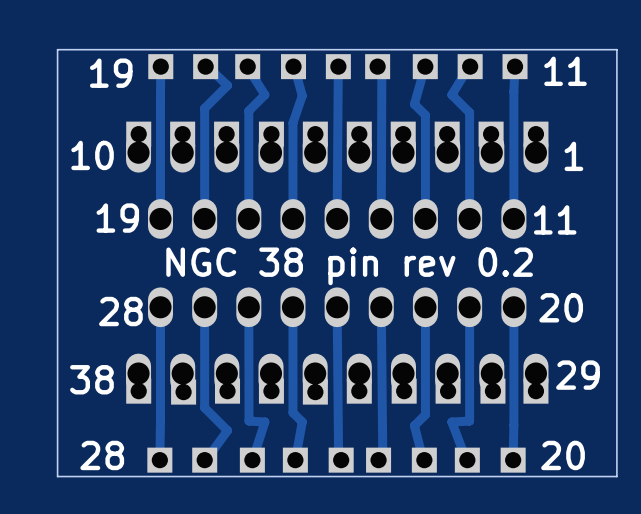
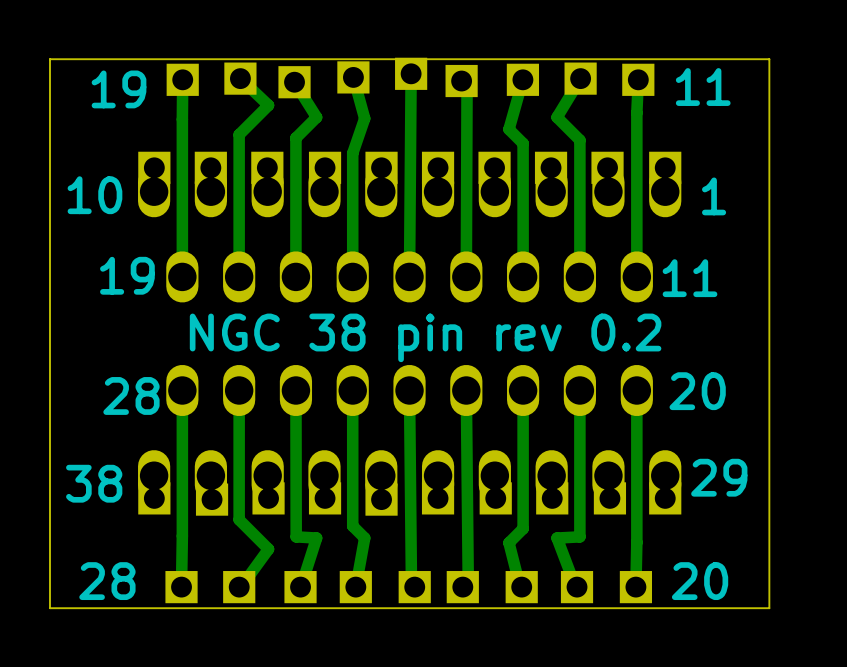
part footprint: [148, 54, 528, 80] -> [166, 57, 655, 99]

